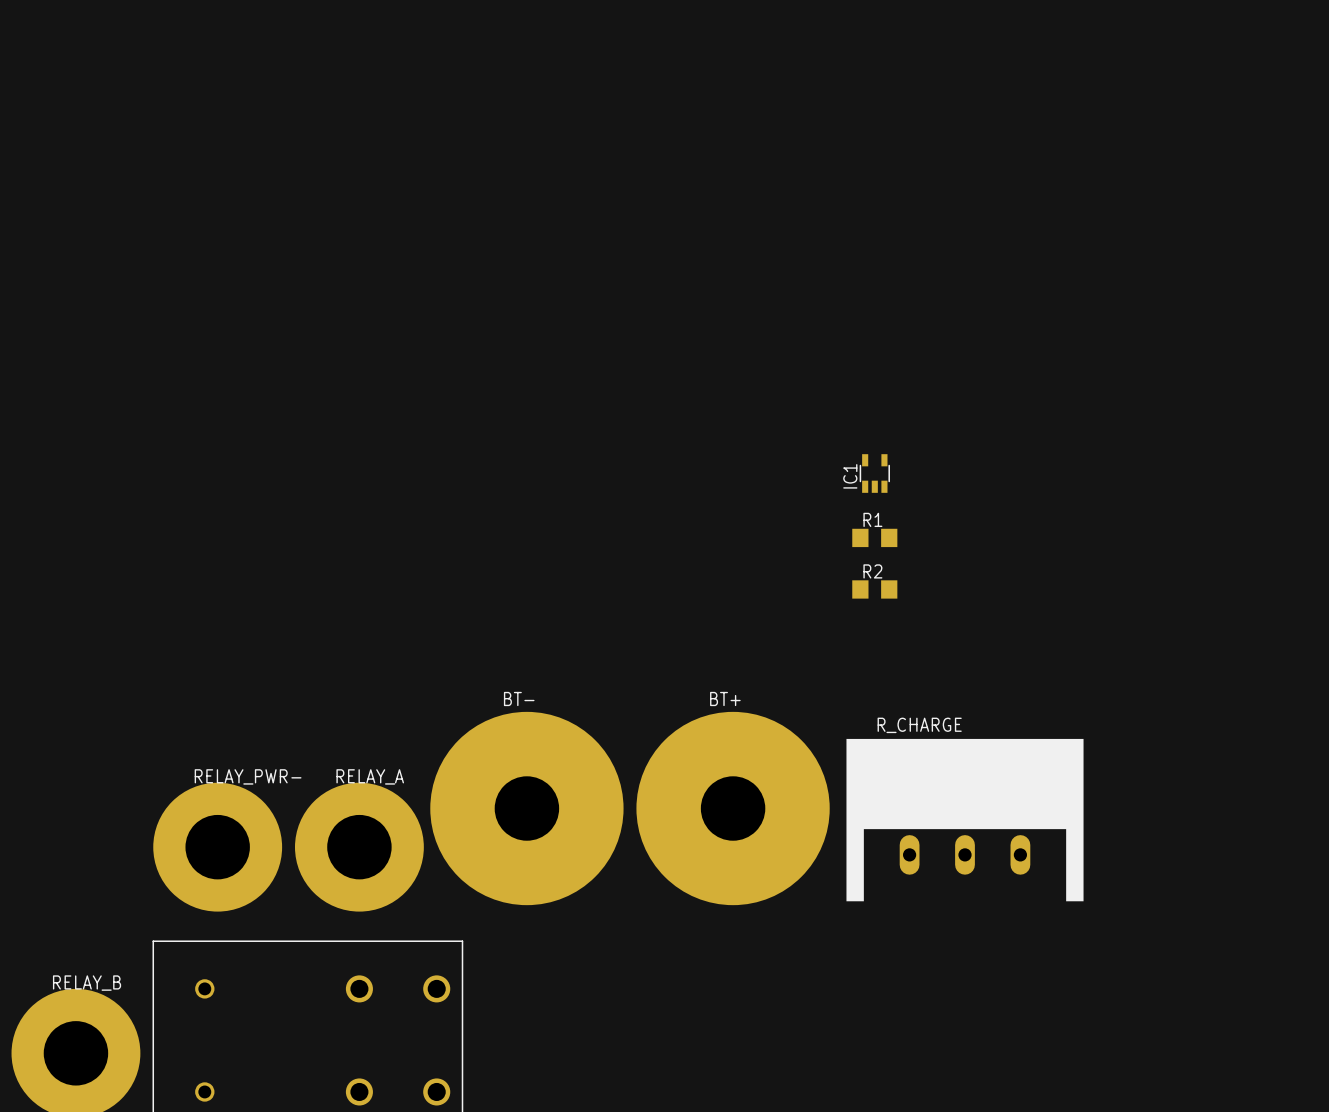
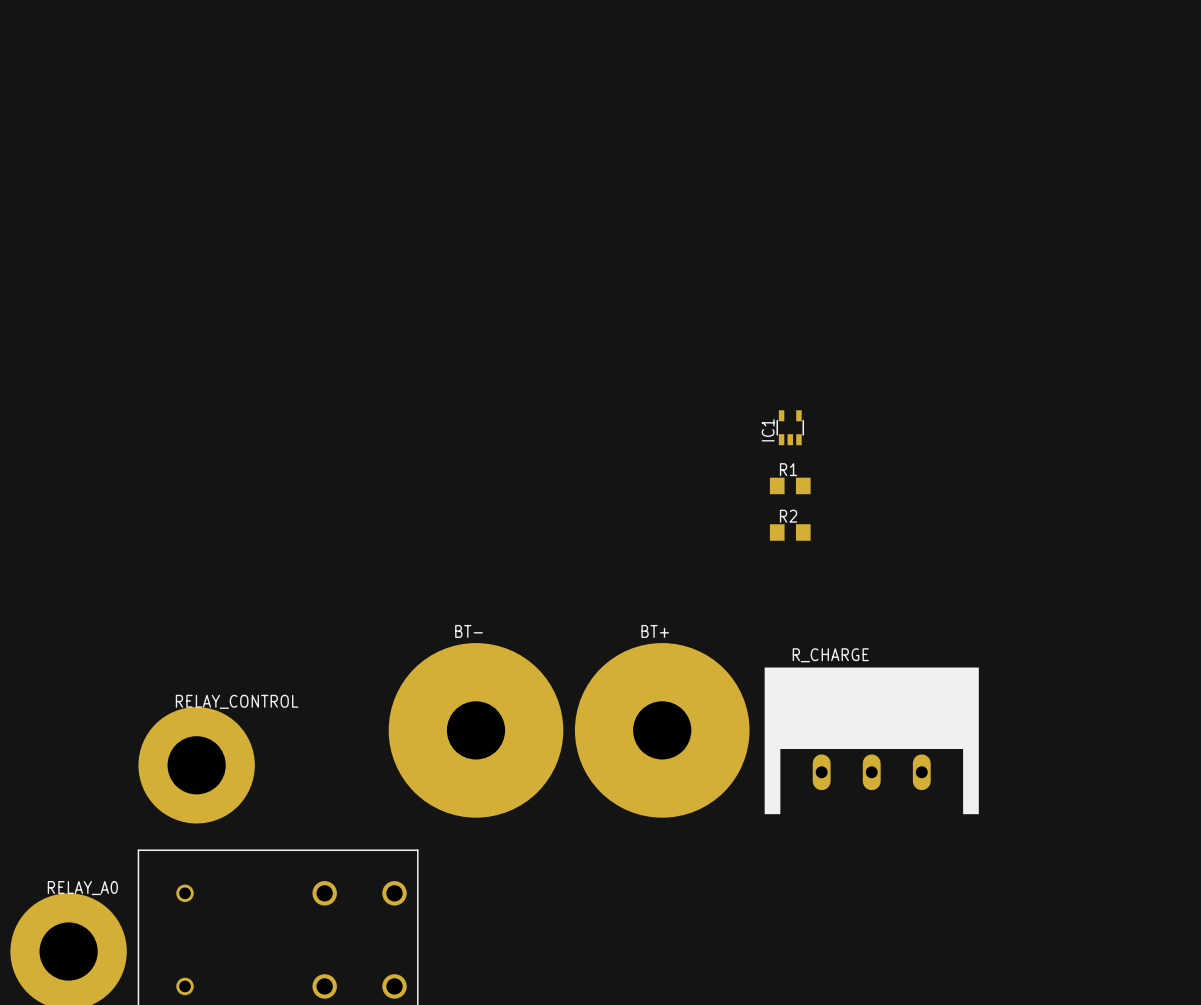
RELAY_PWR- name: RELAY_PWR- (248, 776) -> RELAY_CONTROL (237, 701)
RELAY_A: (359, 847) -> none
RELAY_B name: RELAY_B (87, 983) -> RELAY_A0 (82, 888)

